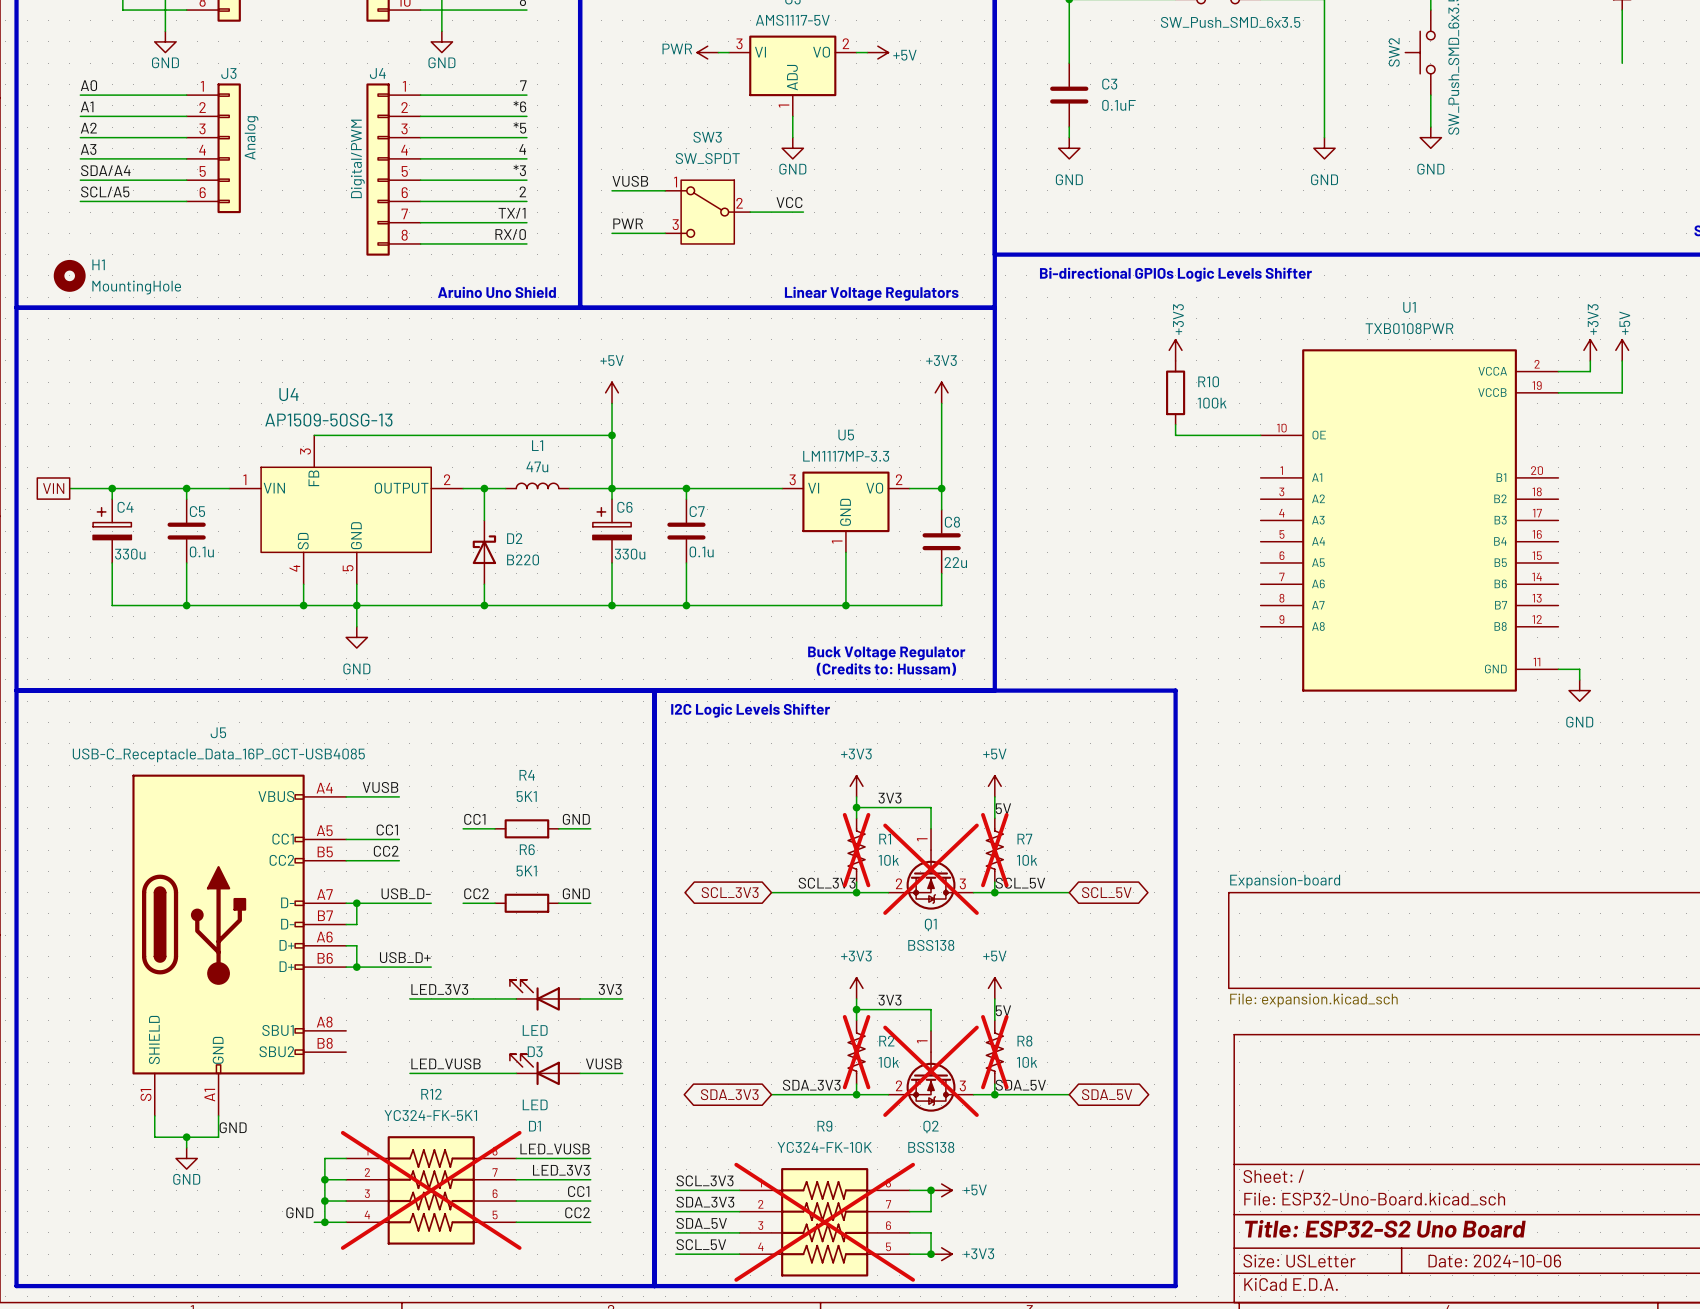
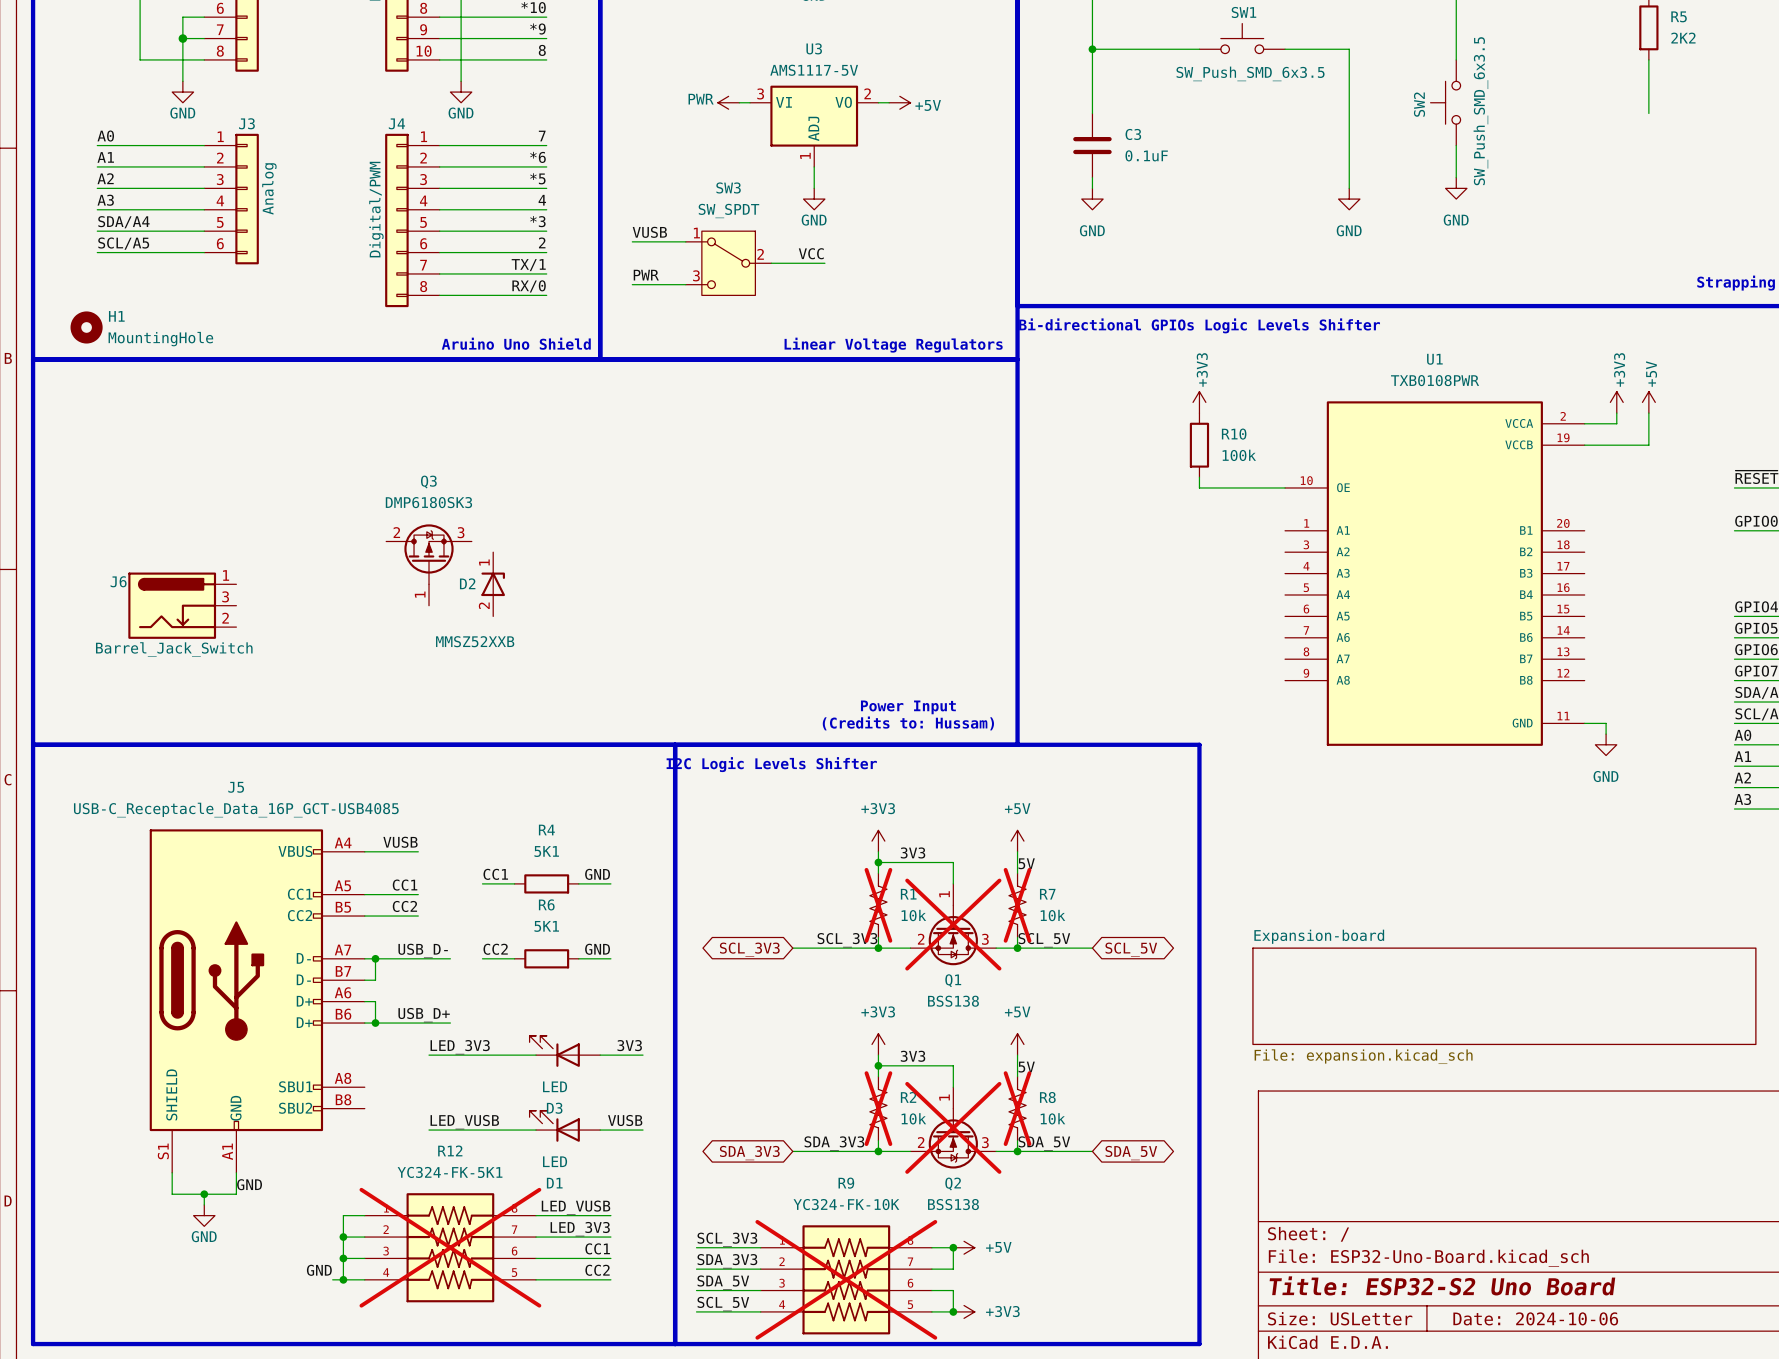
power symbol: +5V (612, 392) -> none
power symbol: +3V3 (941, 392) -> none
wire: (612, 403) (612, 499) -> none
wire: (941, 403) (941, 509) -> none
wire: (314, 435) (612, 435) -> none
junction: (612, 435) -> none
L1: 47u (537, 485) -> none
global label: VIN (53, 488) -> none
wire: (69, 488) (229, 488) -> none
wire: (112, 488) (112, 499) -> none
junction: (112, 488) -> none
wire: (186, 488) (186, 499) -> none
junction: (186, 488) -> none
wire: (463, 488) (505, 488) -> none
wire: (484, 488) (484, 520) -> none
junction: (484, 488) -> none
wire: (569, 488) (782, 488) -> none
junction: (612, 488) -> none
wire: (686, 488) (686, 499) -> none
junction: (686, 488) -> none
wire: (909, 488) (941, 488) -> none
junction: (941, 488) -> none
U4: AP1509-50SG-13 (346, 509) -> none
Q3: none -> DMP6180SK3 (429, 565)
U5: LM1117MP-3.3 (845, 511) -> none
D2 symbol: [472, 520, 497, 585] -> [481, 552, 505, 617]
C4: 330u (112, 531) -> none
C5: 0.1u (186, 531) -> none
C6: 330u (612, 531) -> none
C7: 0.1u (686, 531) -> none
D2 name position: D2 (514, 538) -> D2 (467, 583)
C8: 22u (941, 541) -> none
J6: none -> Barrel_Jack_Switch (182, 605)
wire: (845, 552) (845, 605) -> none
D2 value: B220 (523, 559) -> MMSZ52XXB (475, 641)
wire: (112, 562) (112, 605) (941, 605) (941, 573) -> none
wire: (612, 562) (612, 605) -> none
wire: (686, 562) (686, 605) -> none
wire: (303, 584) (303, 605) -> none
wire: (356, 584) (356, 626) -> none
wire: (484, 584) (484, 605) -> none
junction: (186, 605) -> none
junction: (303, 605) -> none
junction: (356, 605) -> none
junction: (484, 605) -> none
junction: (612, 605) -> none
junction: (686, 605) -> none
junction: (845, 605) -> none
power symbol: GND (356, 637) -> none
text: Buck Voltage Regulator (886, 653) -> Power Input (908, 707)

